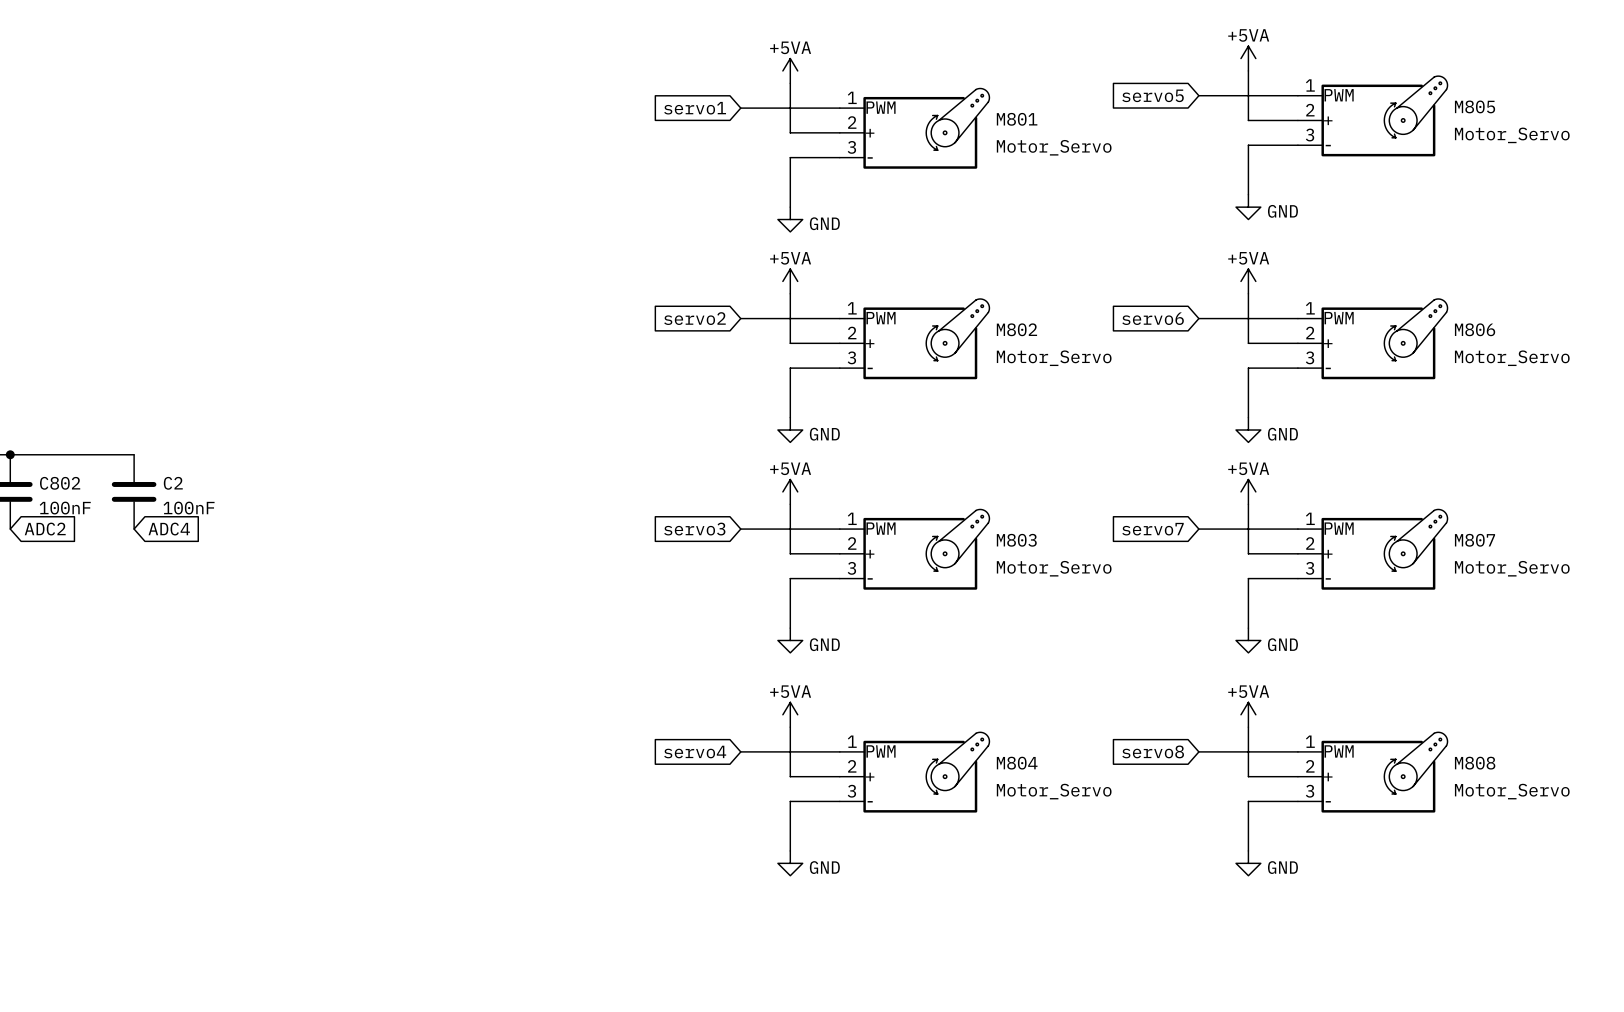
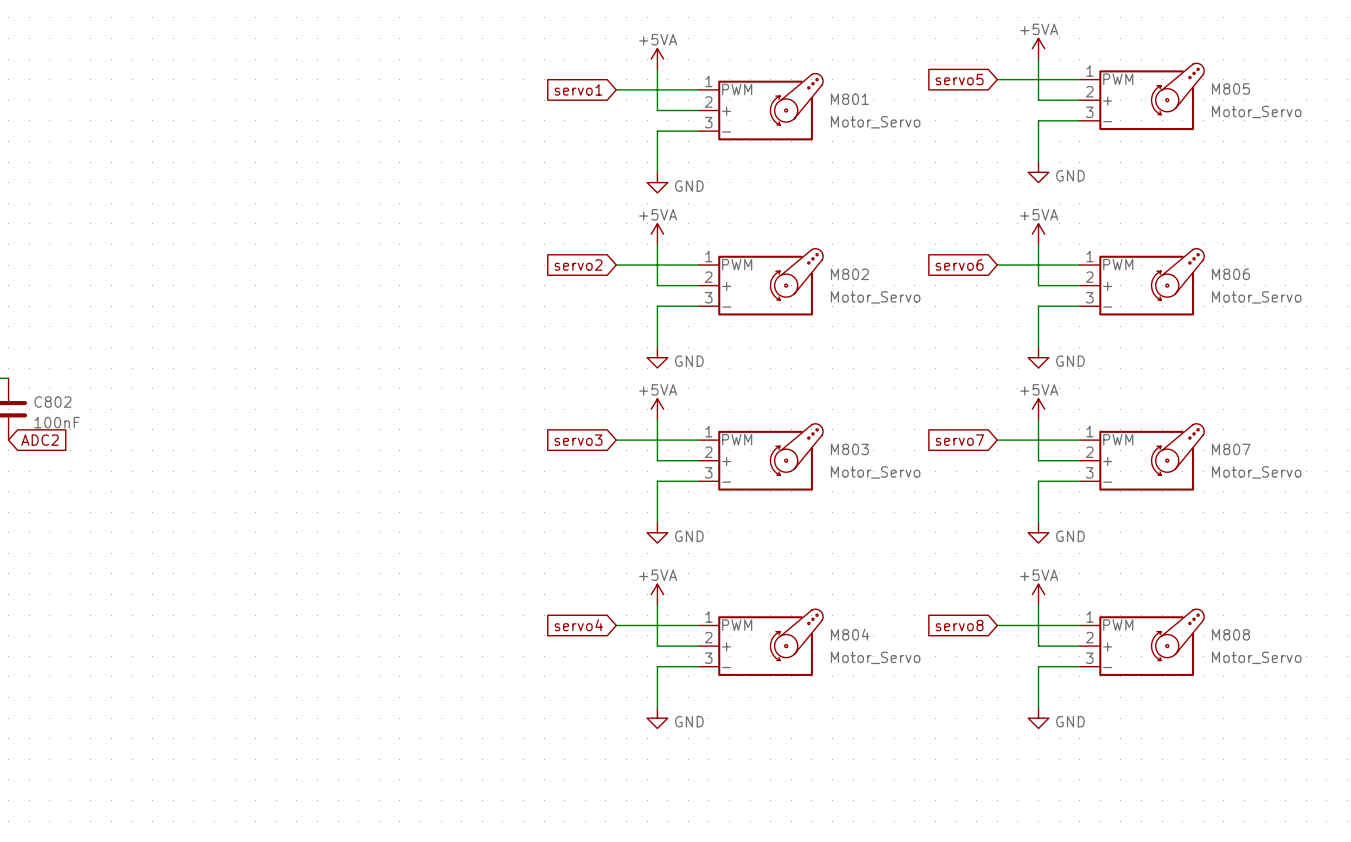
wire: (10, 454) (134, 454) -> none
junction: (10, 454) -> none
C2: 100nF (134, 491) -> none
global label: ADC4 (169, 529) -> none

